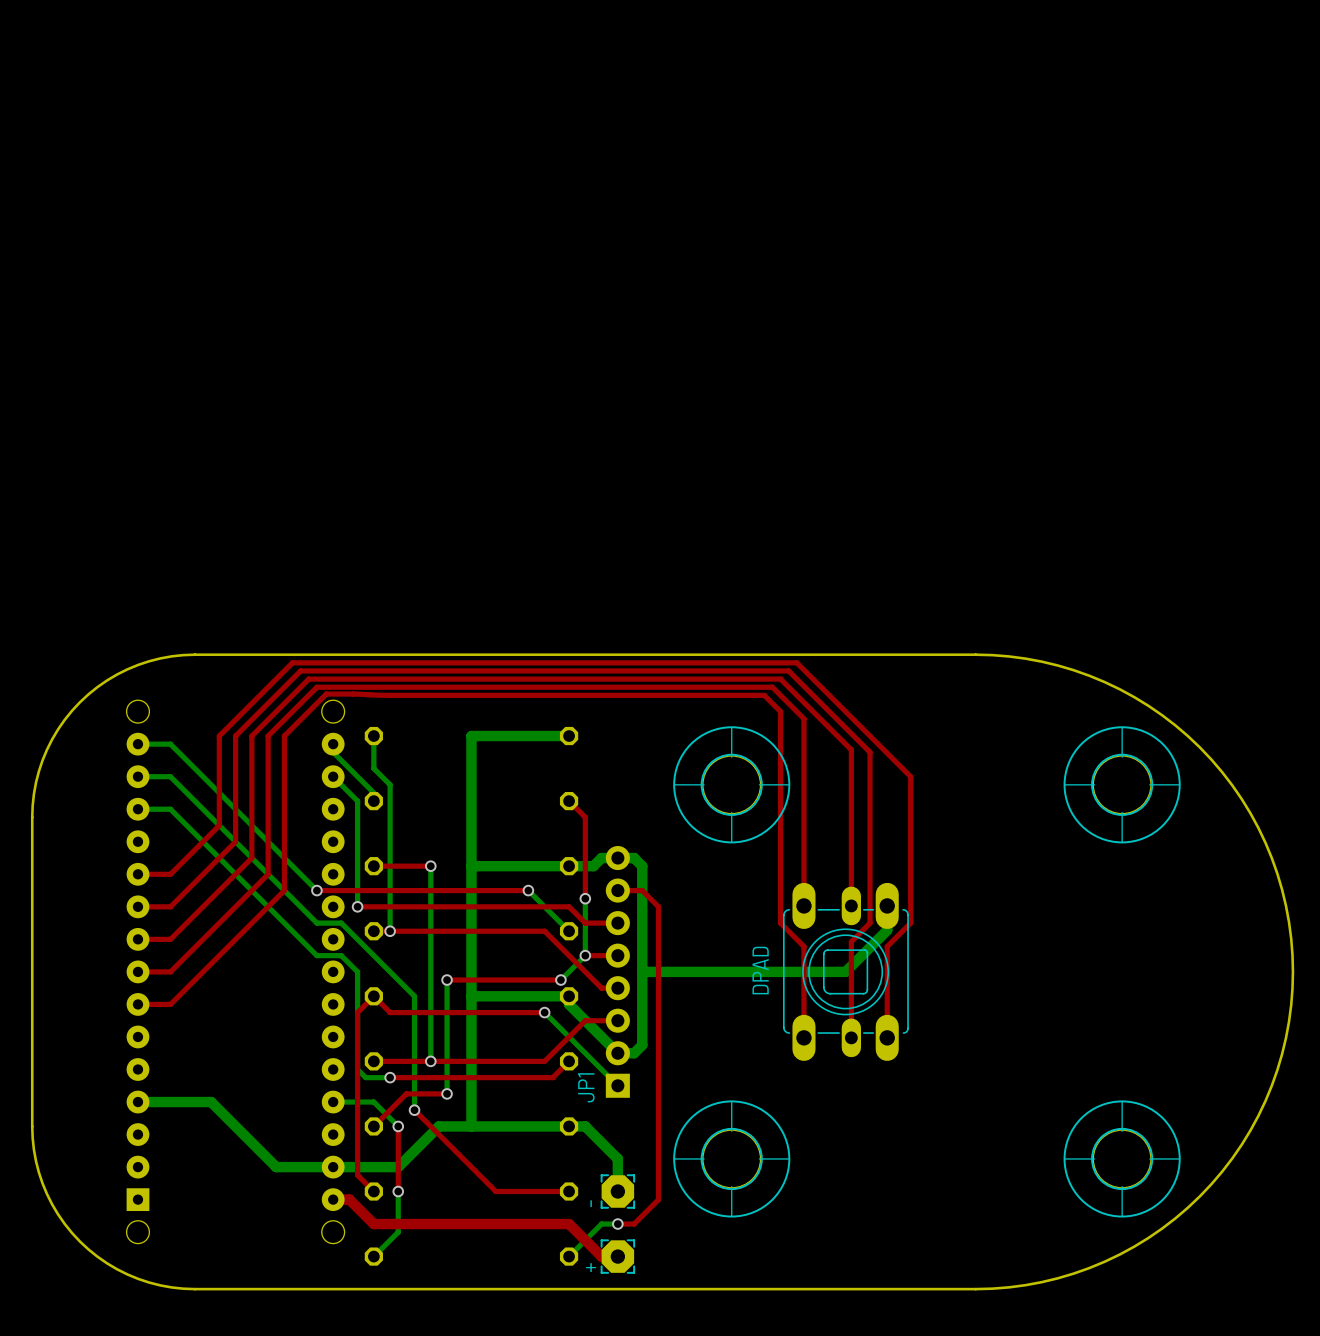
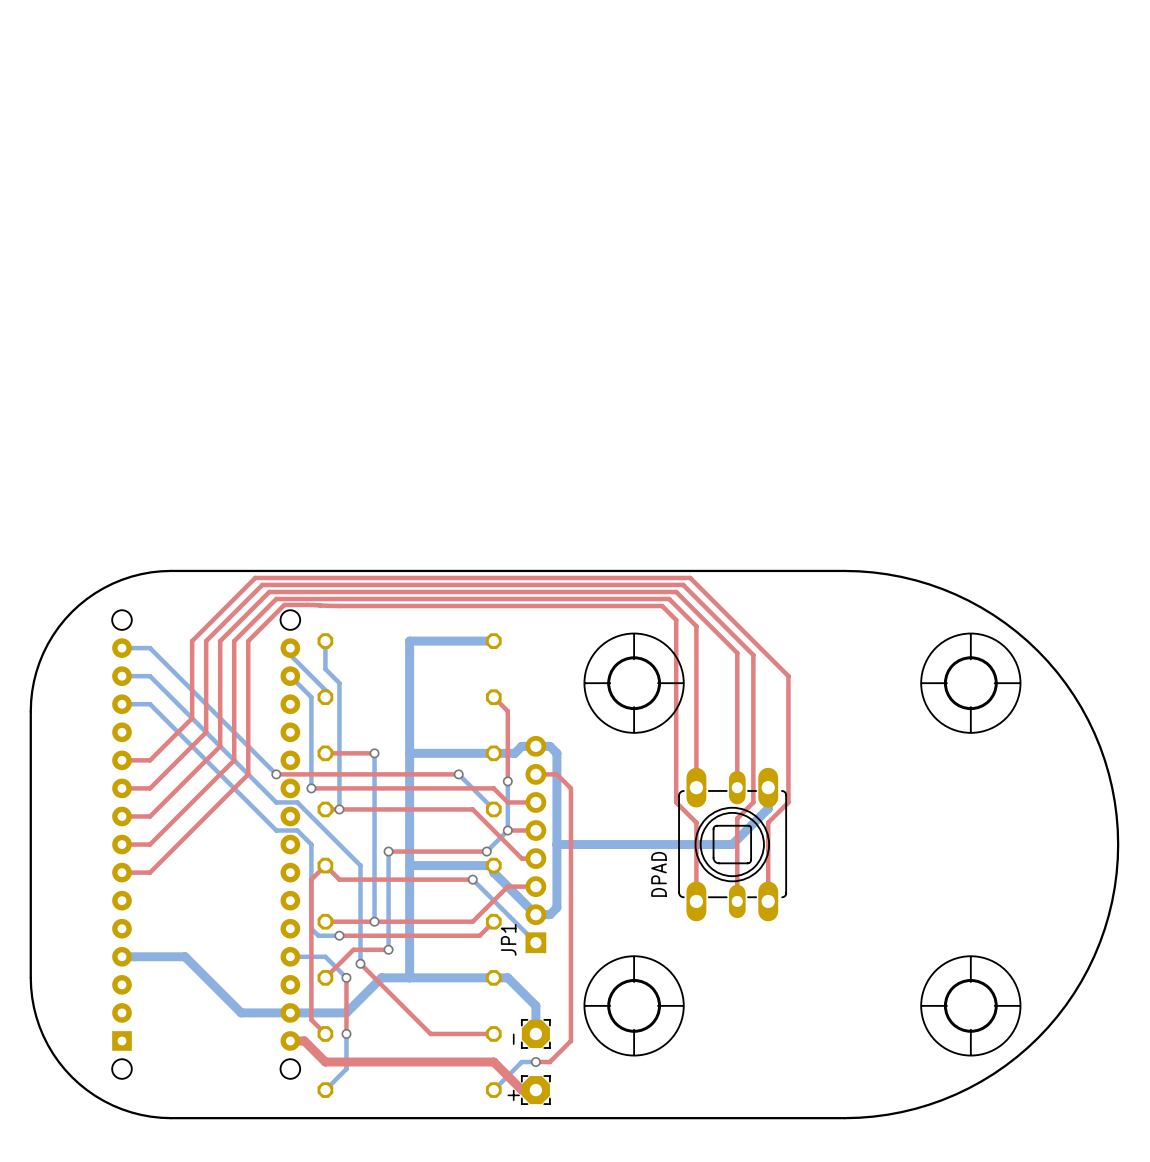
DPAD name position: DPAD (760, 970) -> DPAD (659, 874)

